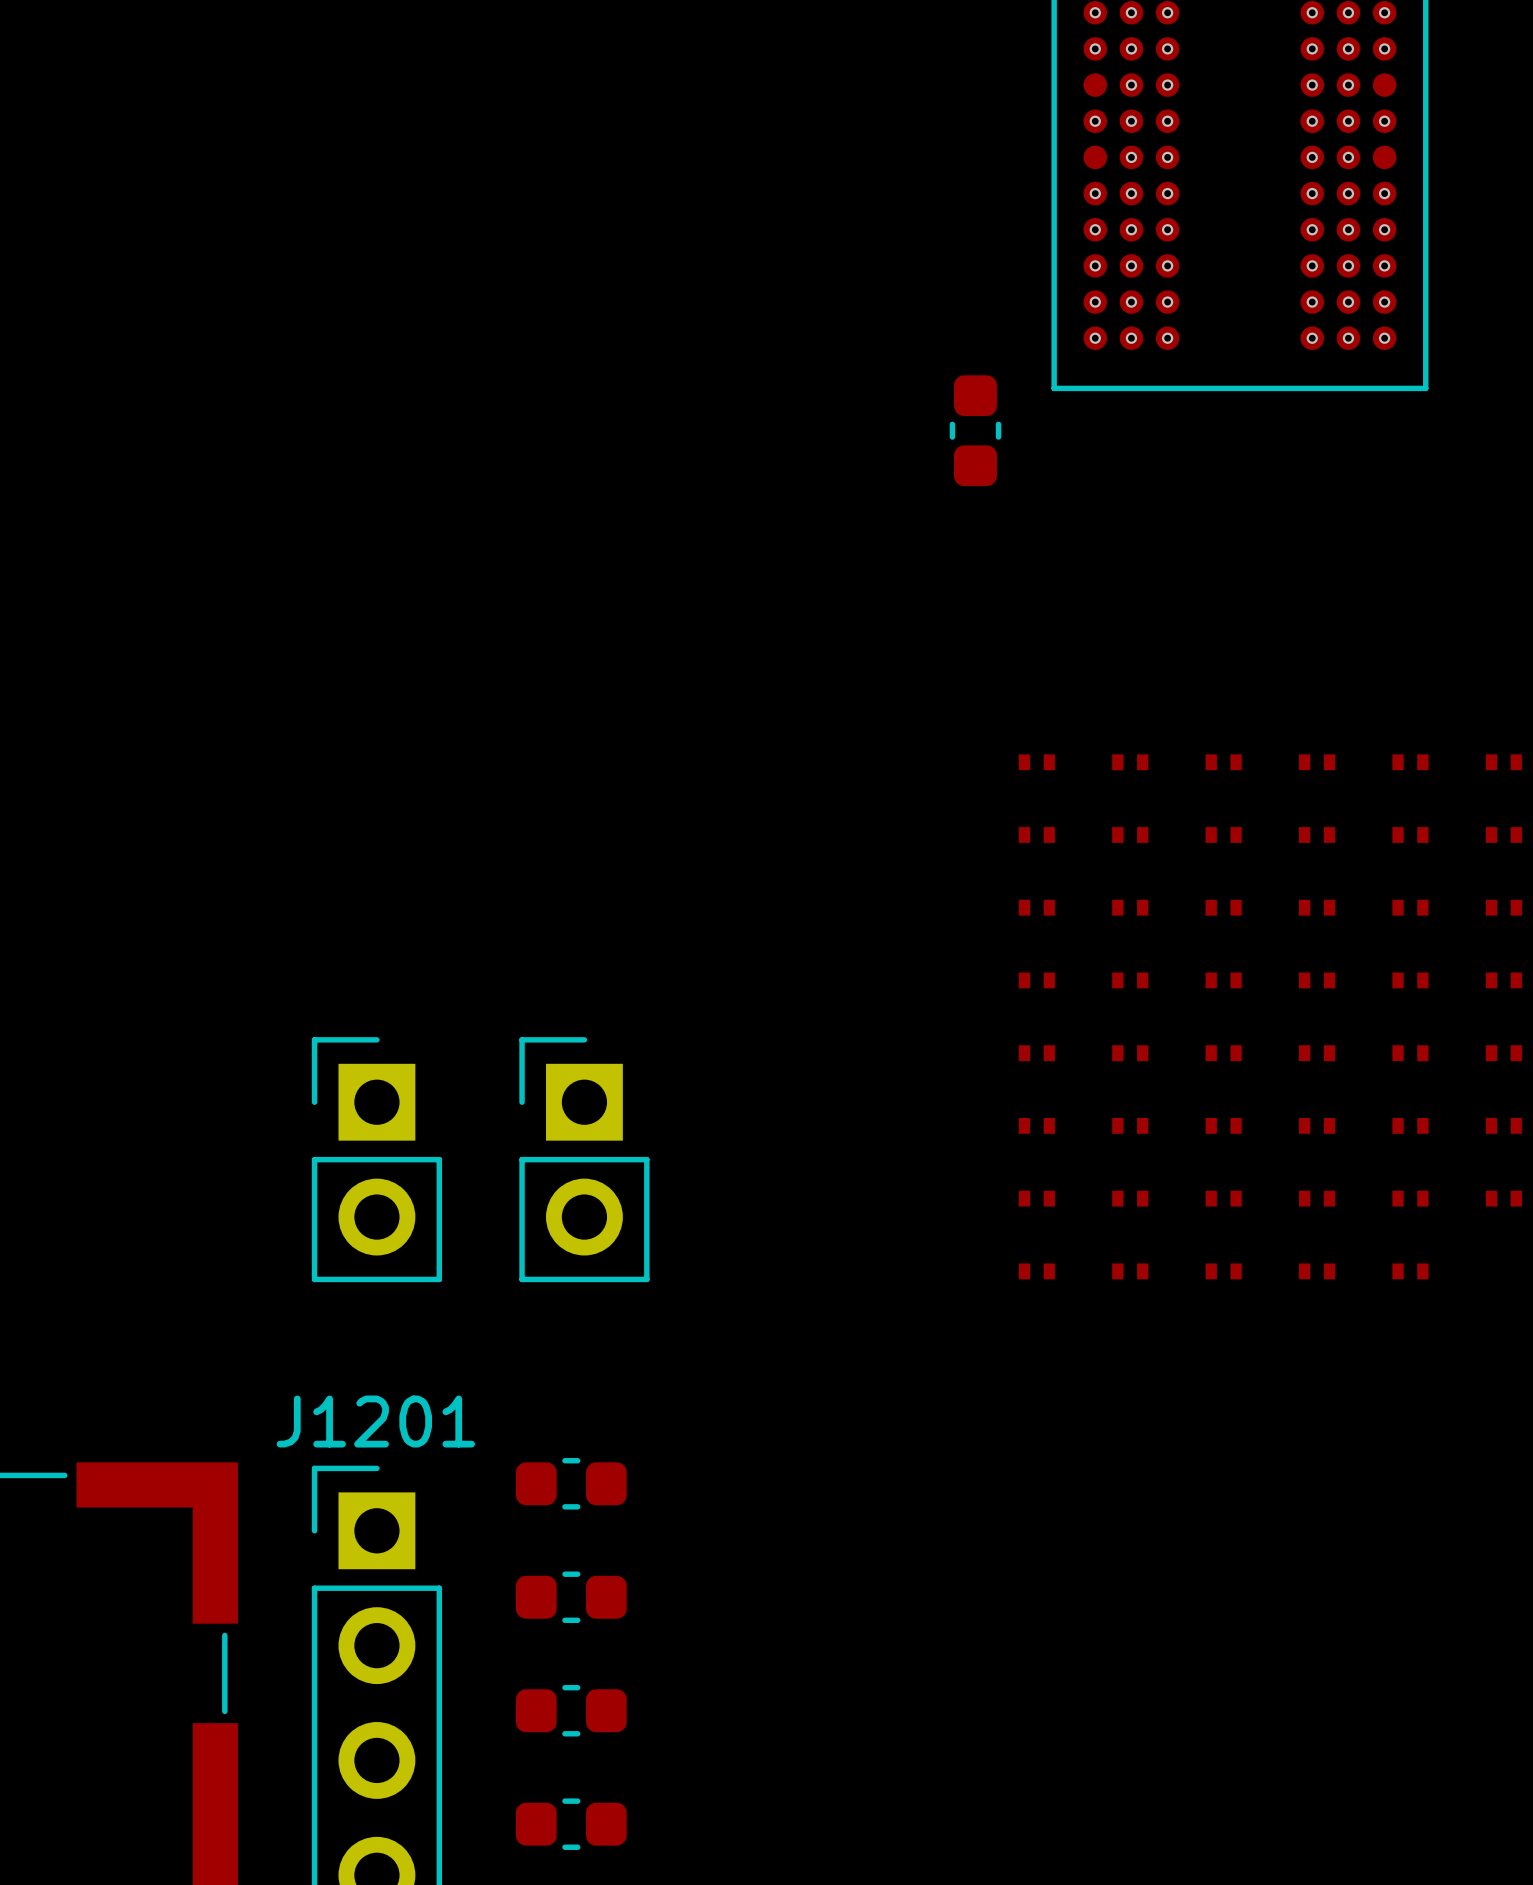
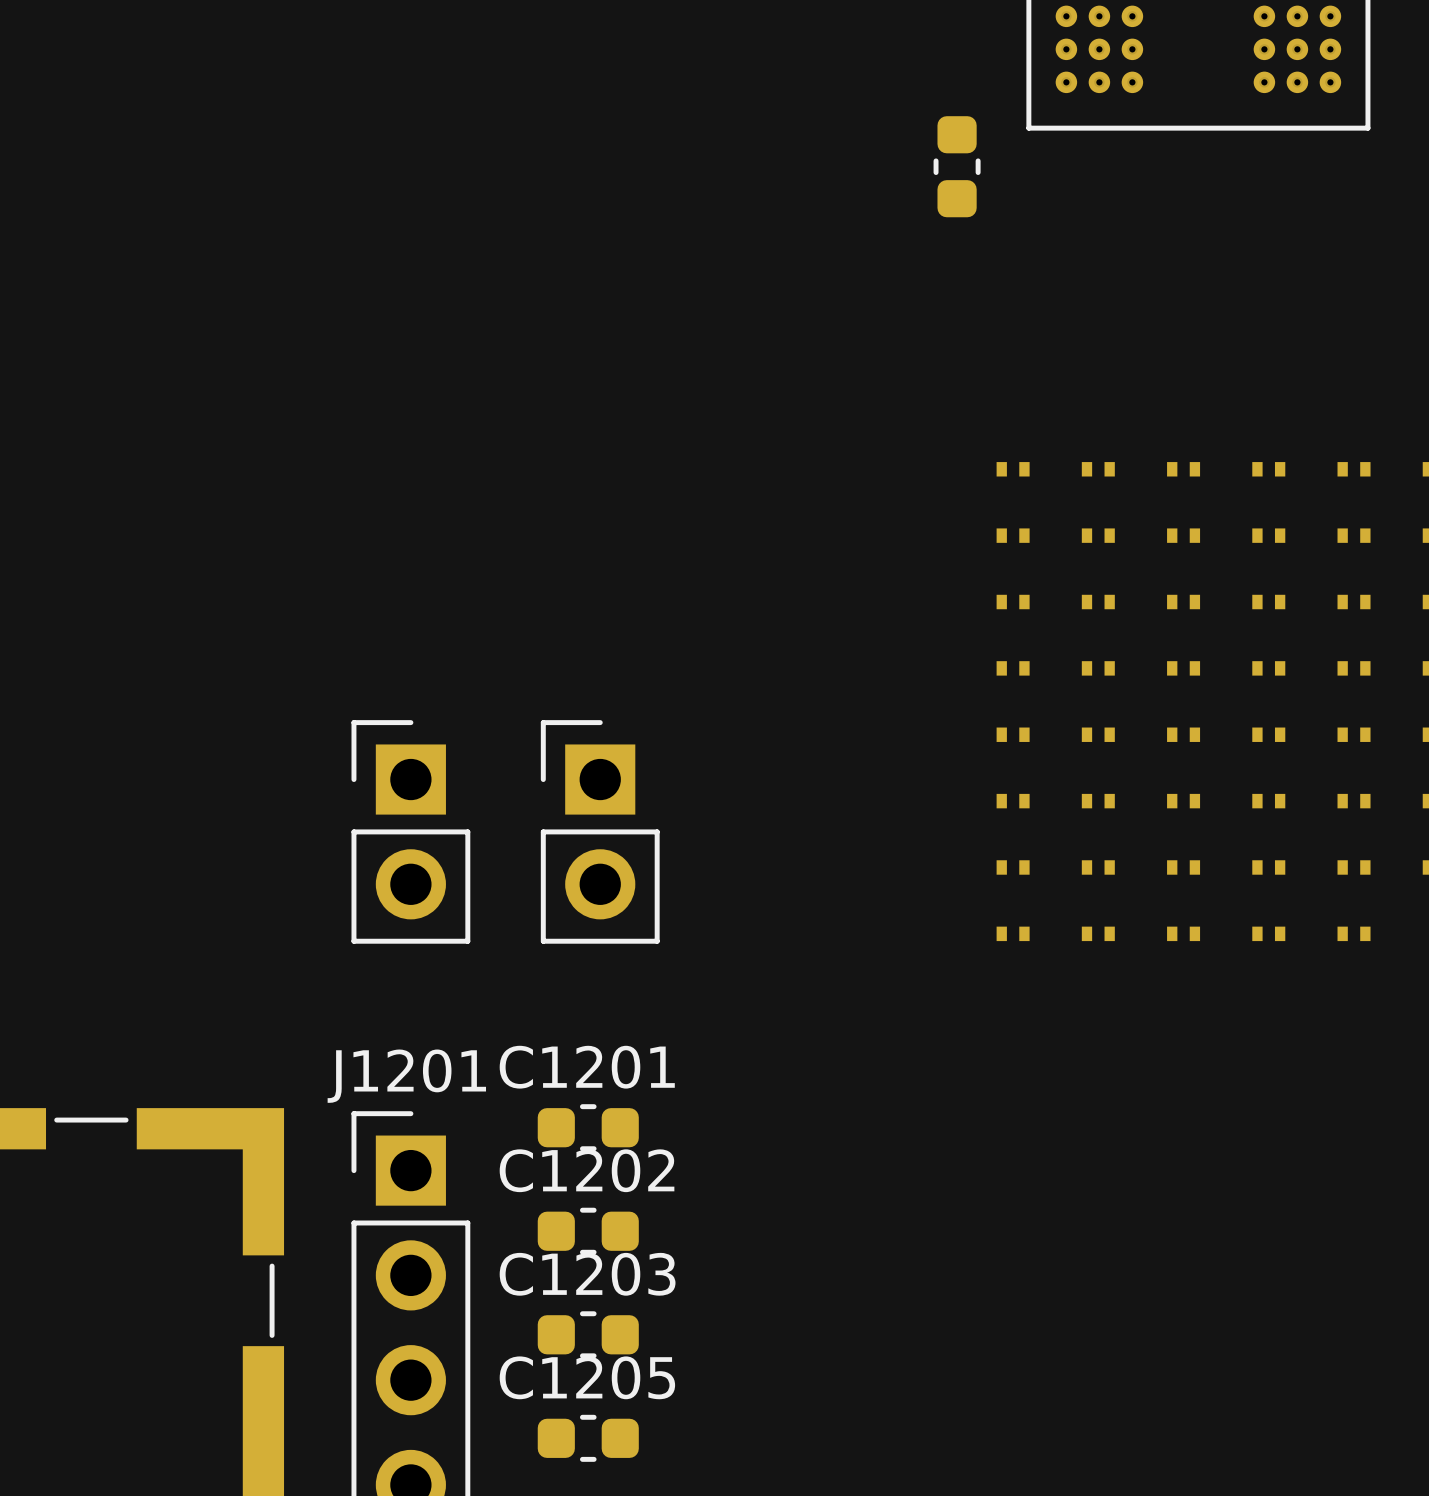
C1201 name: none -> C1201 (587, 1067)
C1202 name: none -> C1202 (587, 1170)
C1203 name: none -> C1203 (587, 1274)
C1205 name: none -> C1205 (587, 1377)

